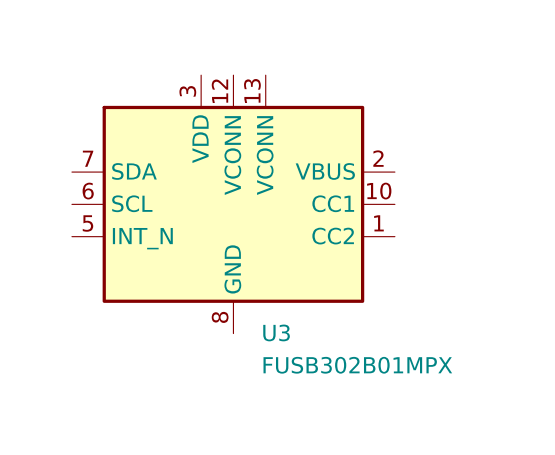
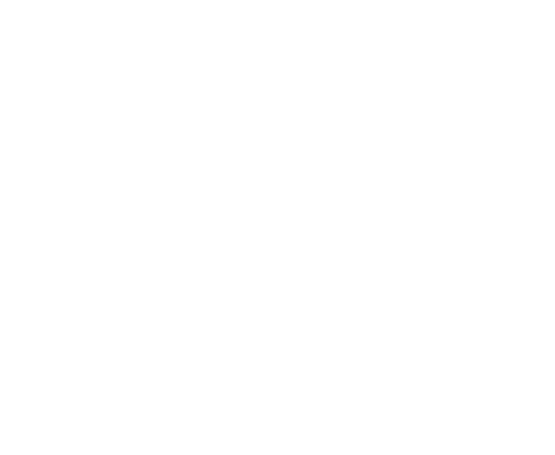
U3: FUSB302B01MPX (233, 204) -> none

